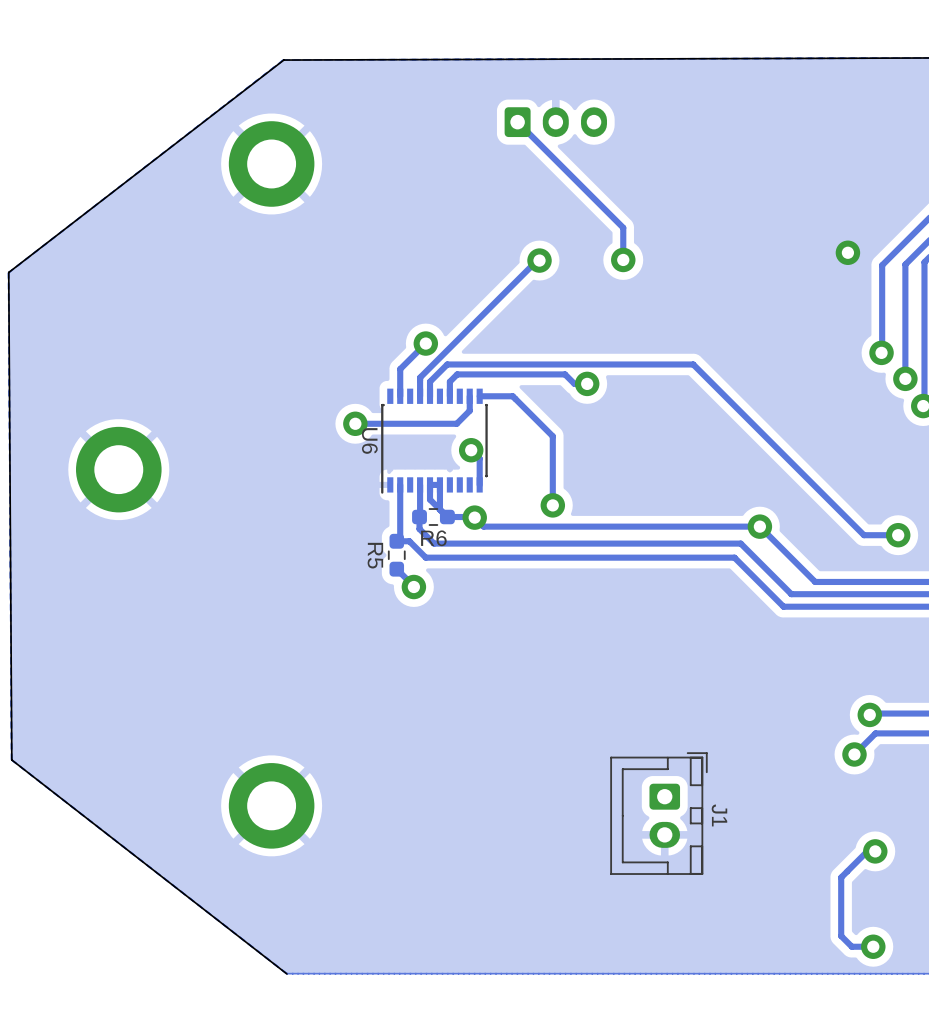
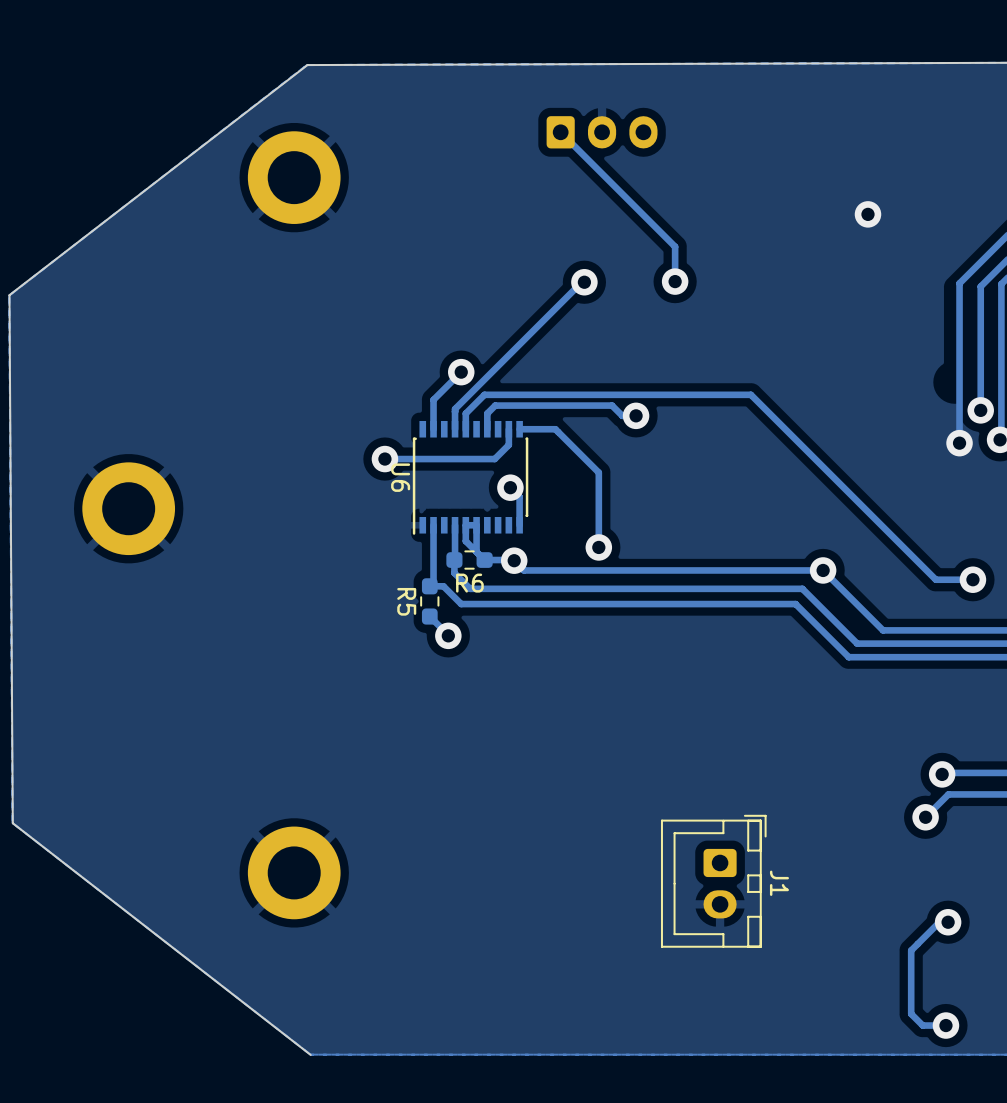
via position: (847, 252) -> (867, 214)
track: (885, 261) (882, 265) (881, 352) -> (959, 283) (959, 443)
via position: (881, 352) -> (959, 443)

